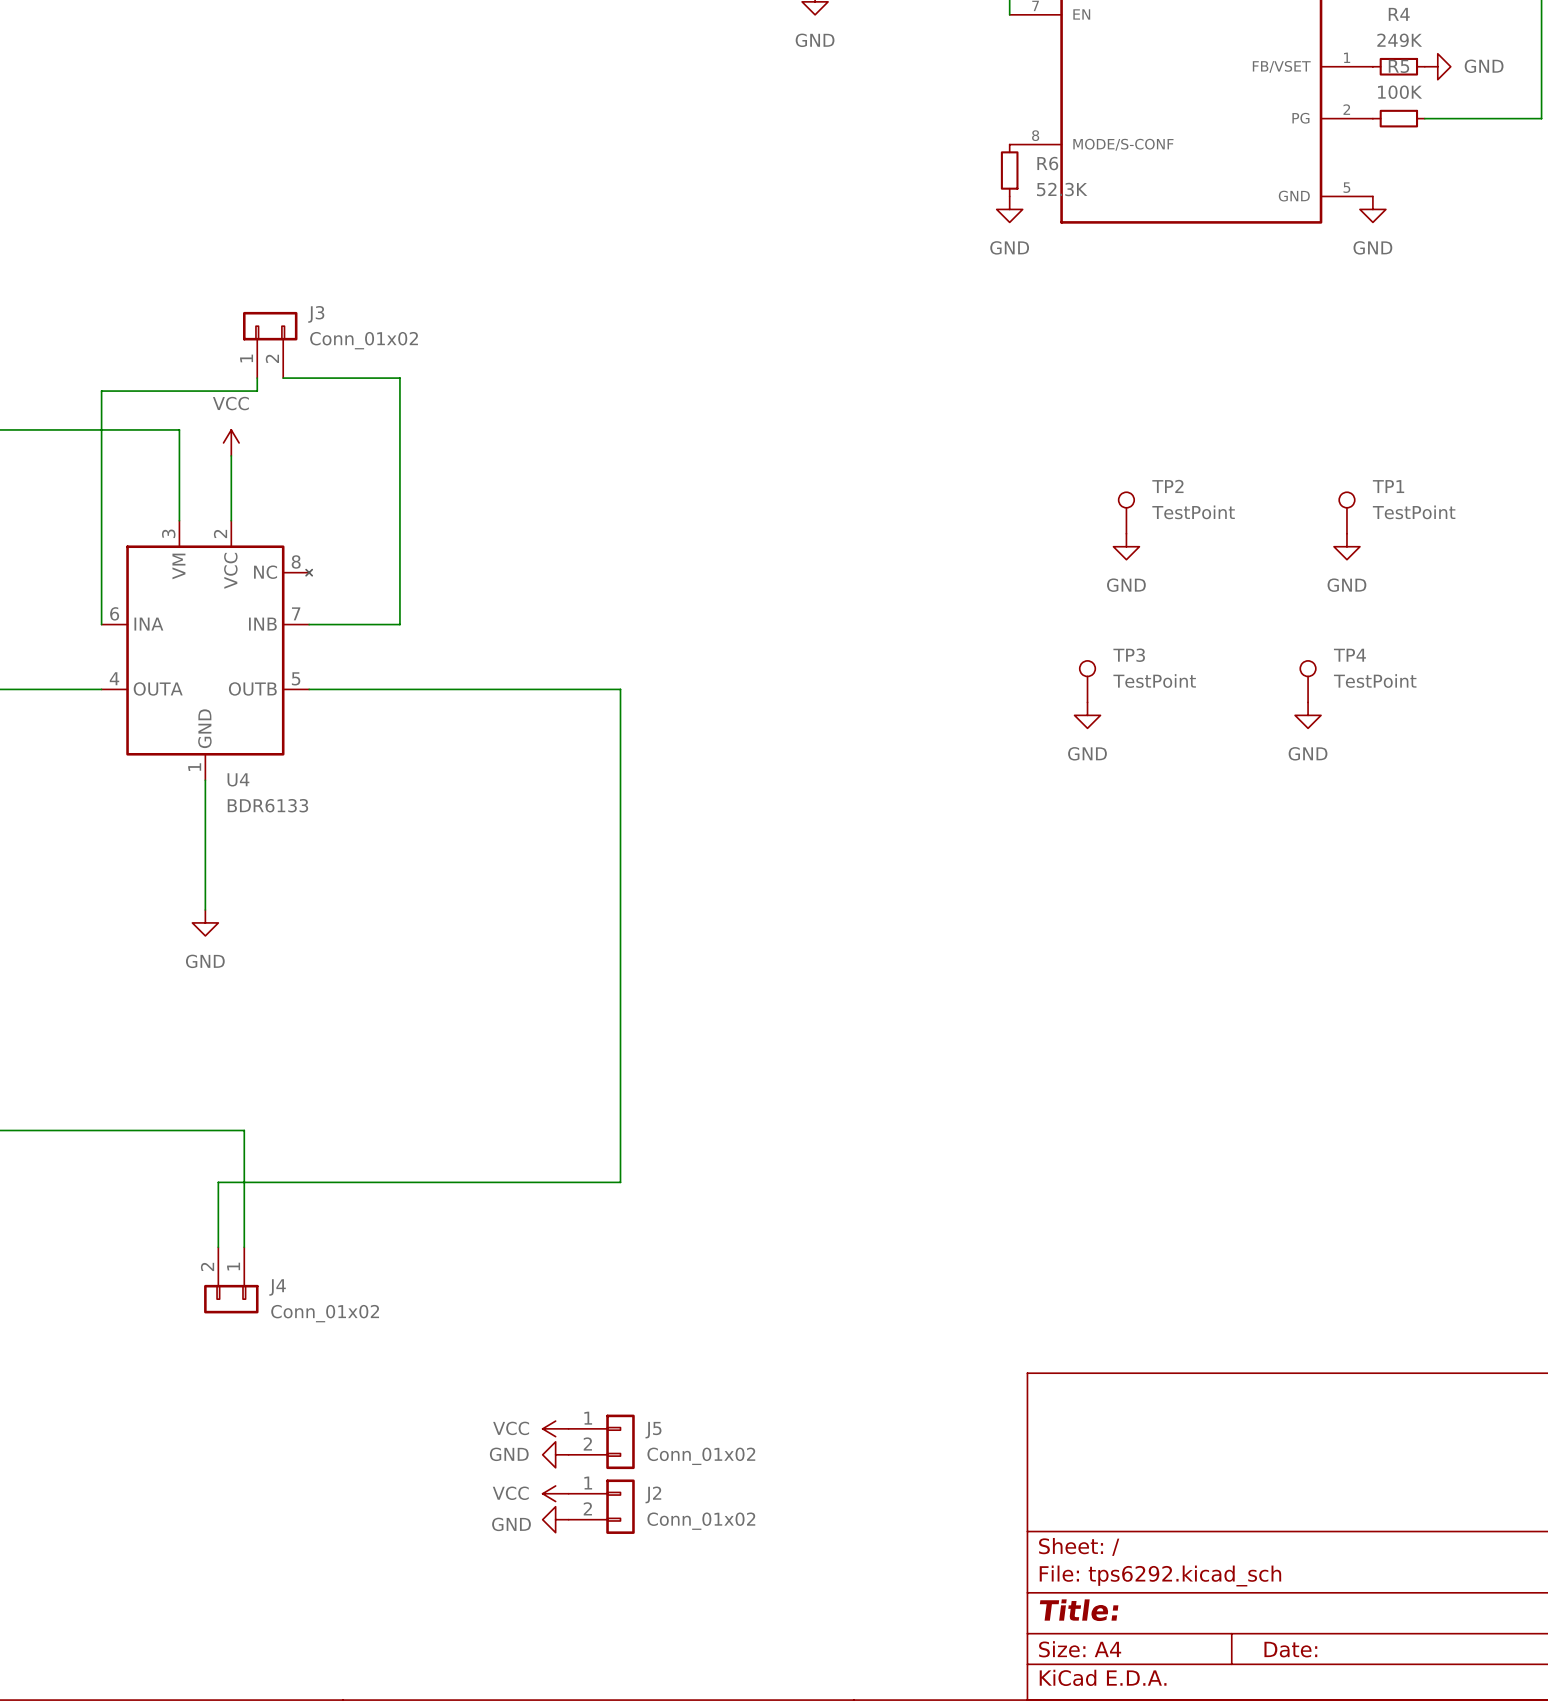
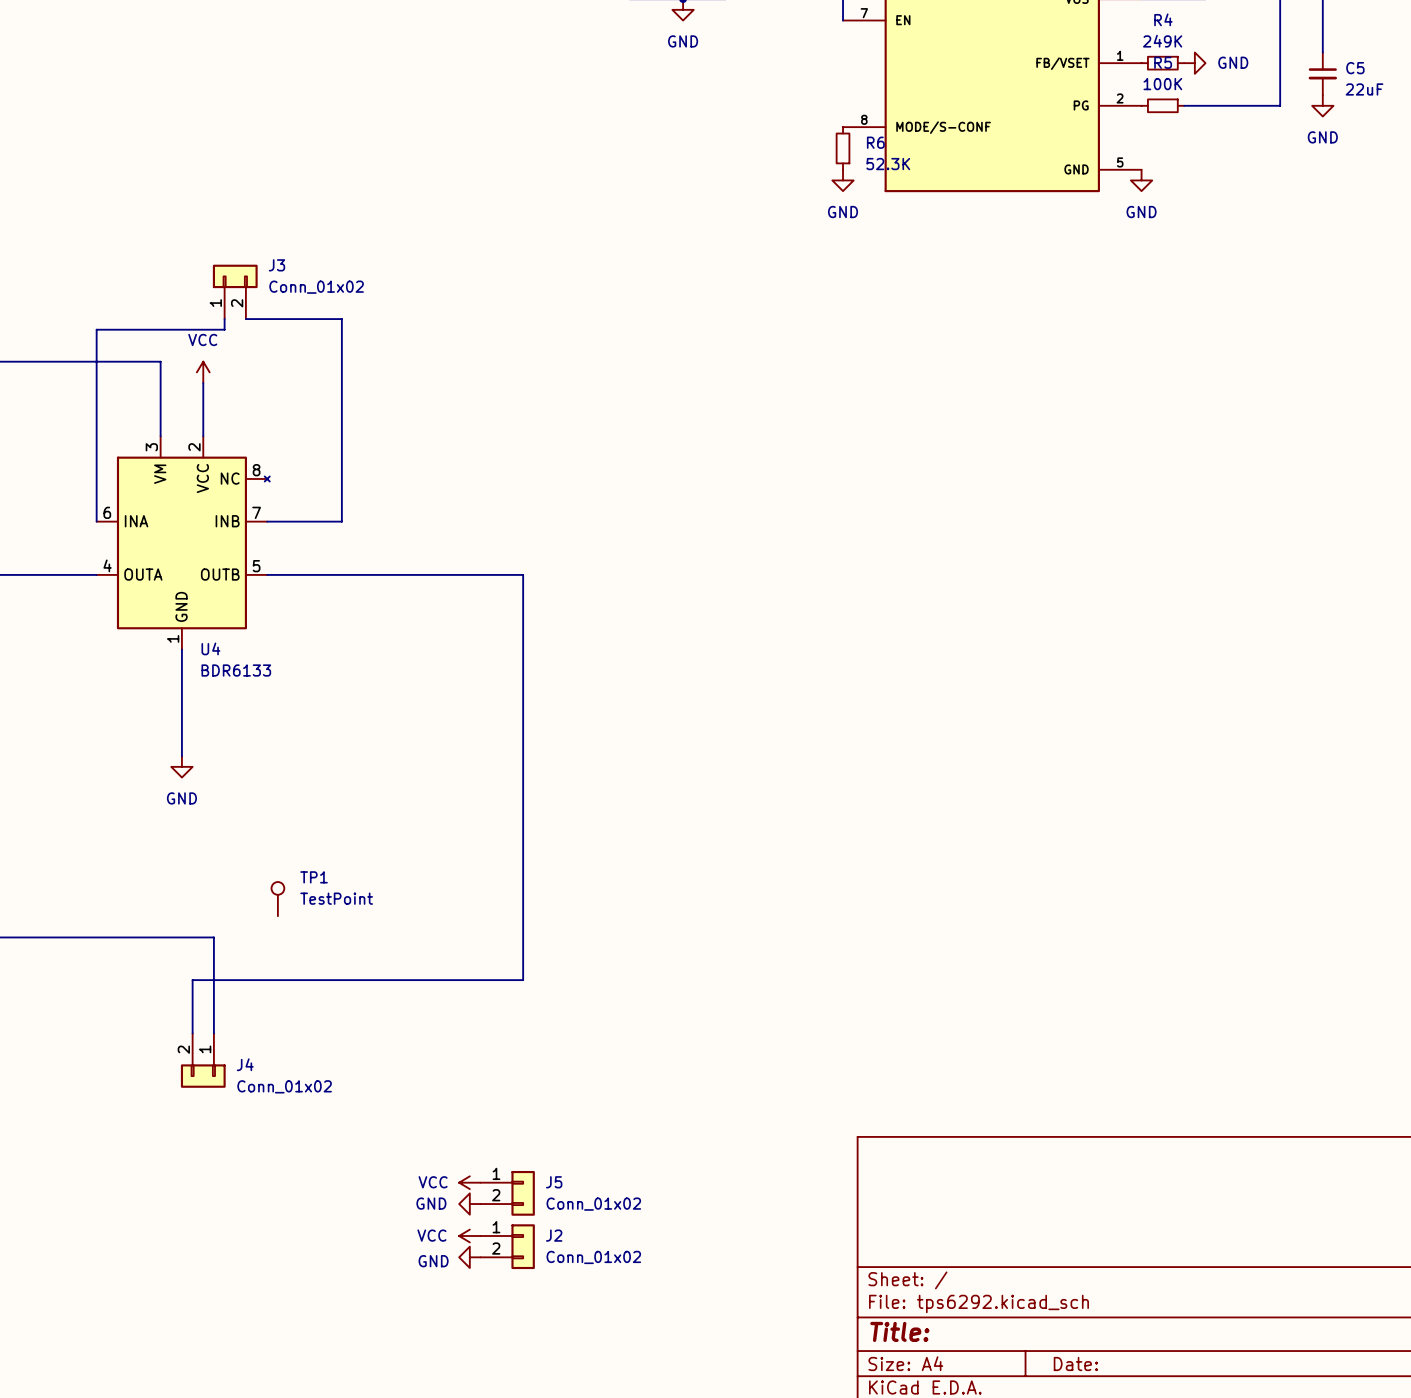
TP2: TestPoint (1126, 513) -> none
TP1 position: (1346, 513) -> (277, 899)
power symbol: GND (1126, 546) -> none
power symbol: GND (1346, 546) -> none
TP3: TestPoint (1087, 681) -> none
TP4: TestPoint (1308, 681) -> none
power symbol: GND (1087, 715) -> none
power symbol: GND (1308, 715) -> none

